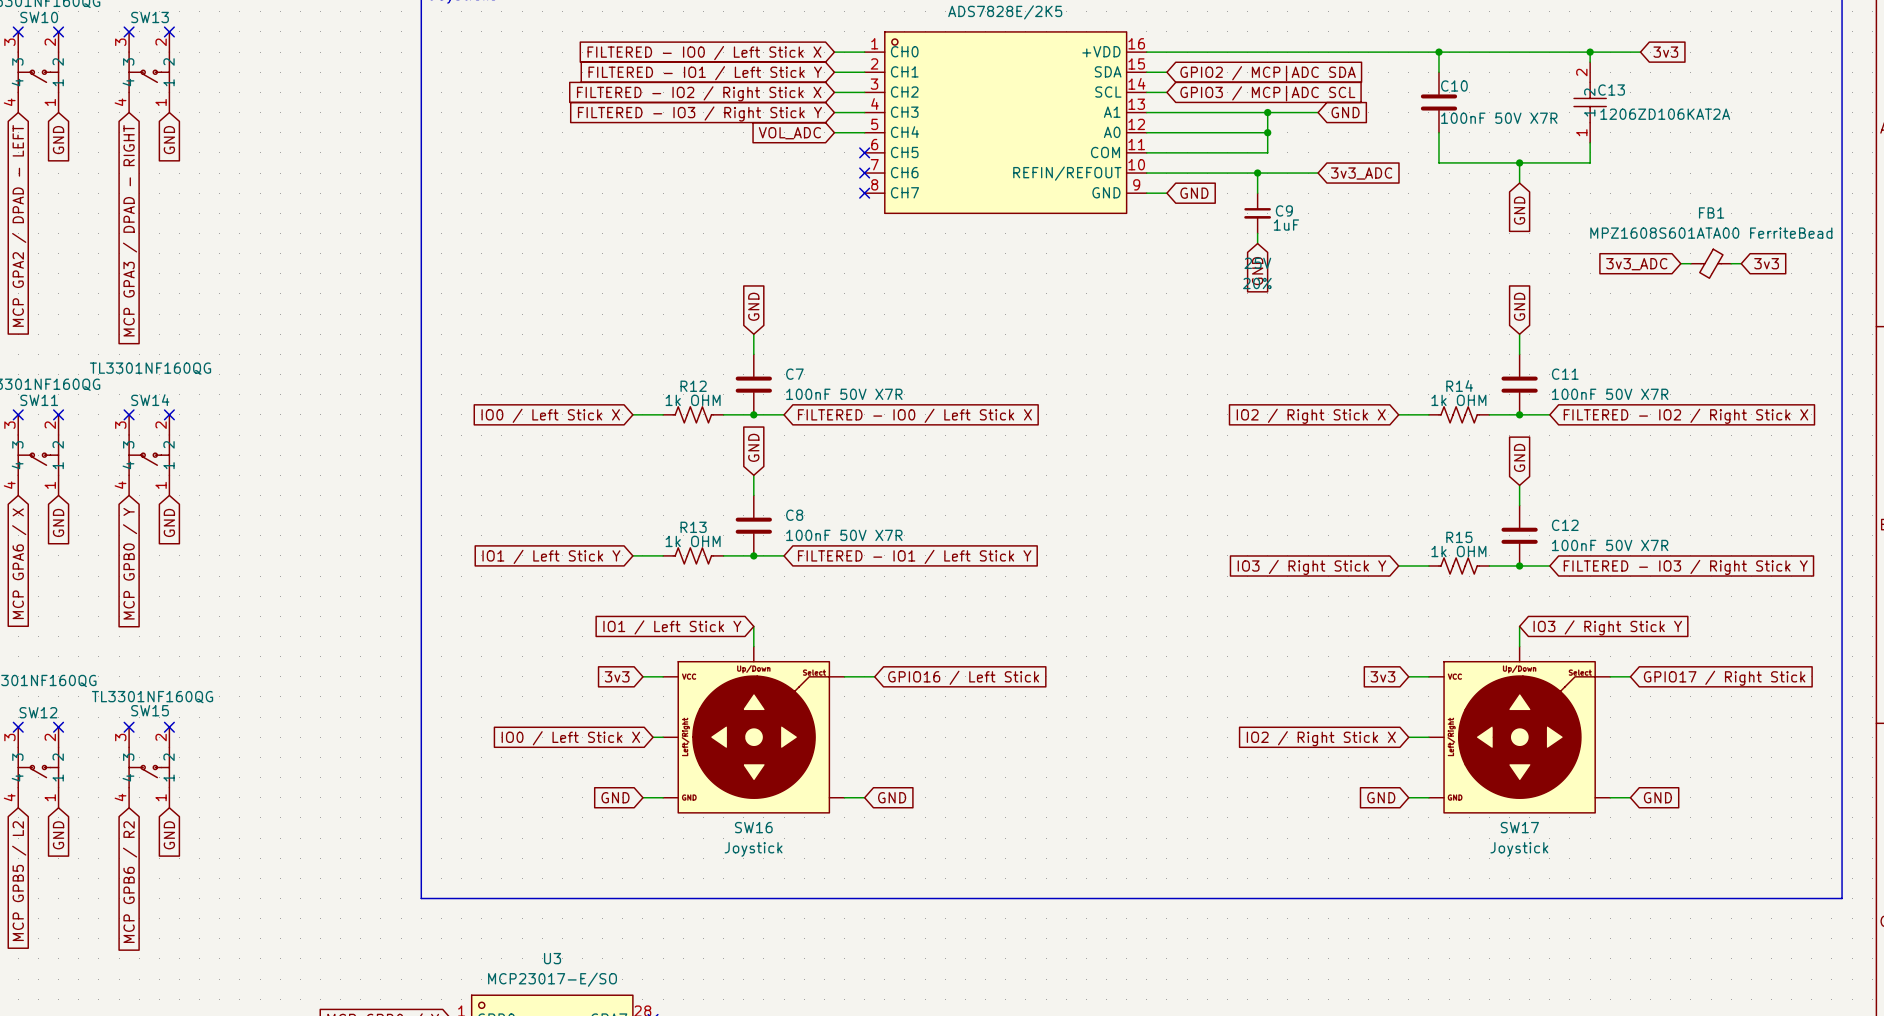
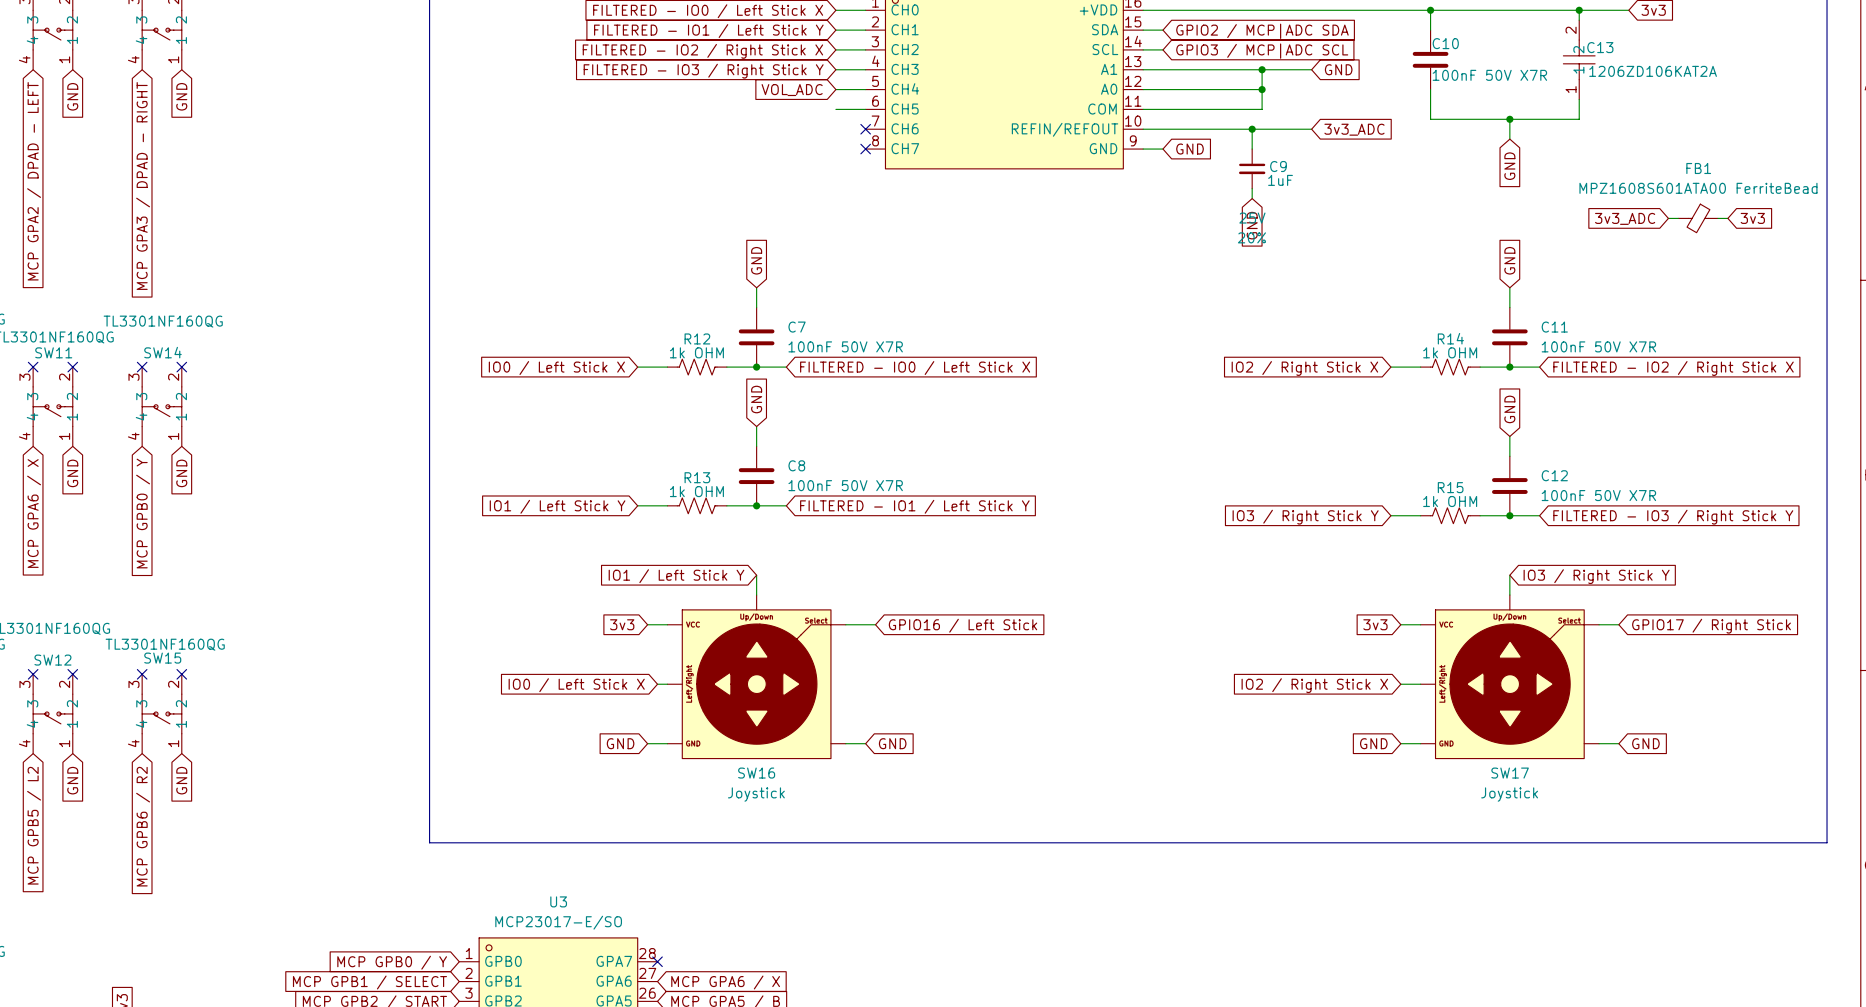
wire: none -> (835, 109) (865, 109)
no-connect mark: (864, 152) -> none

